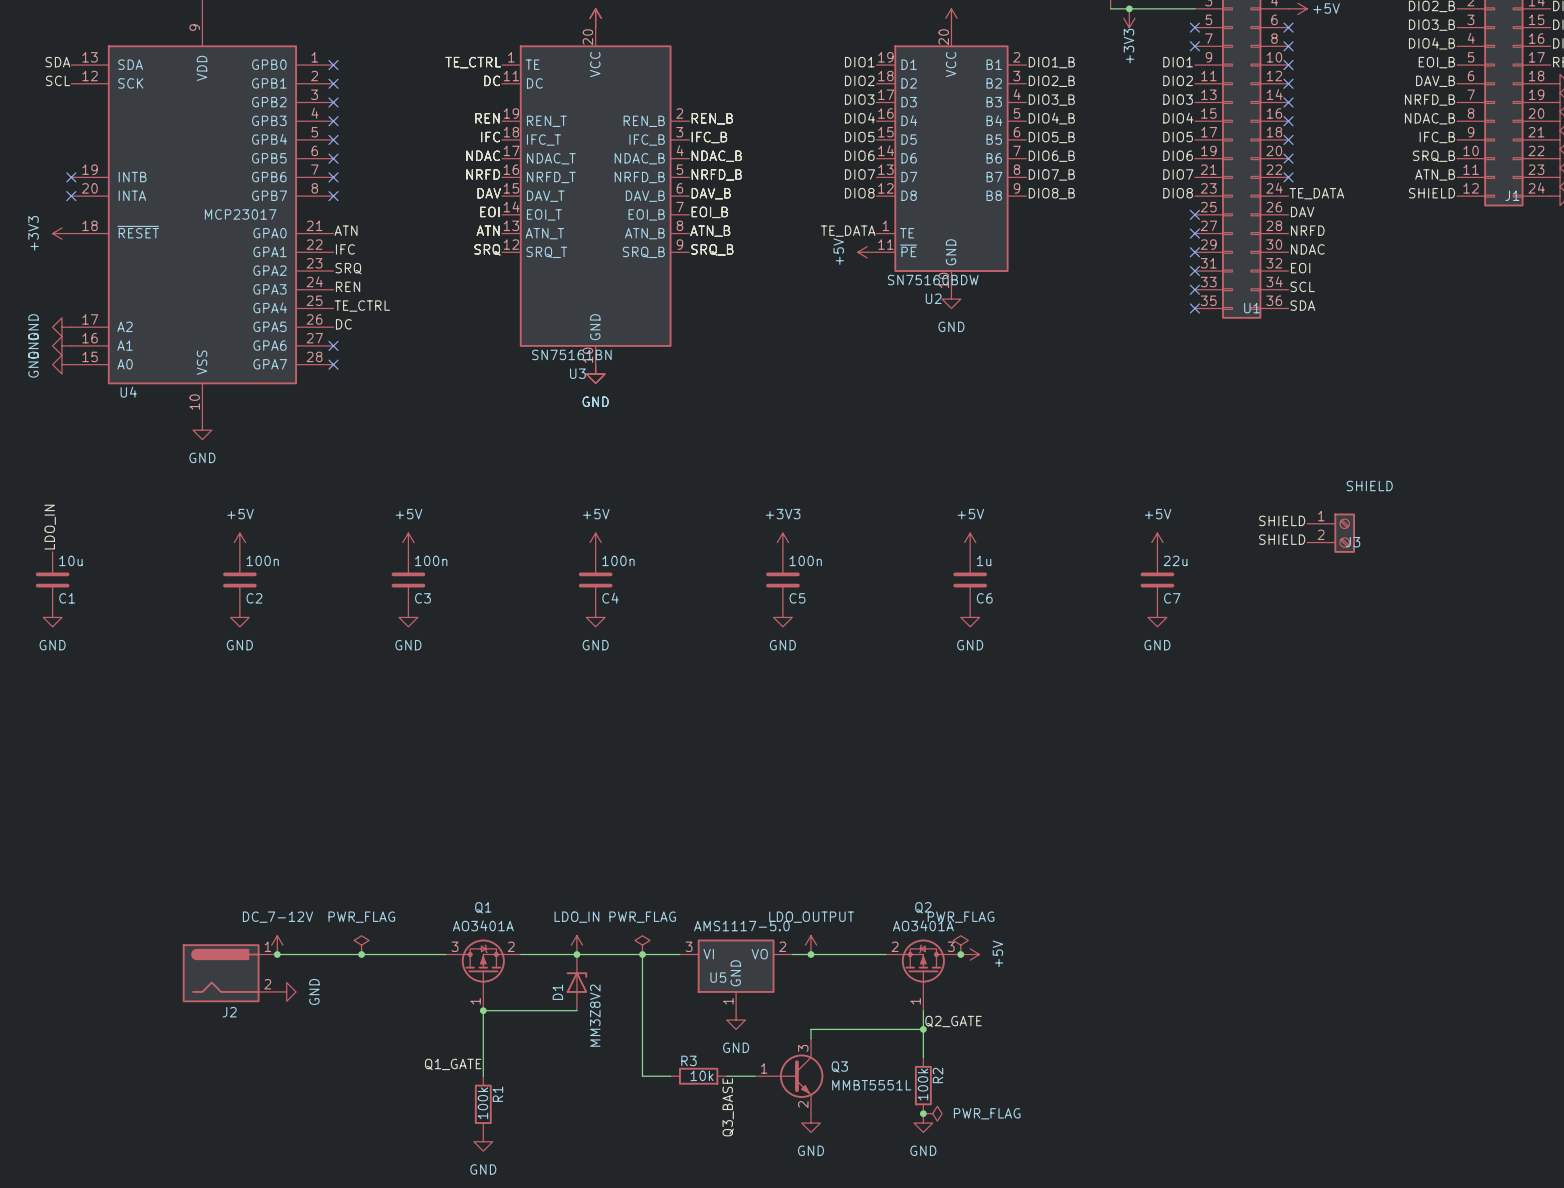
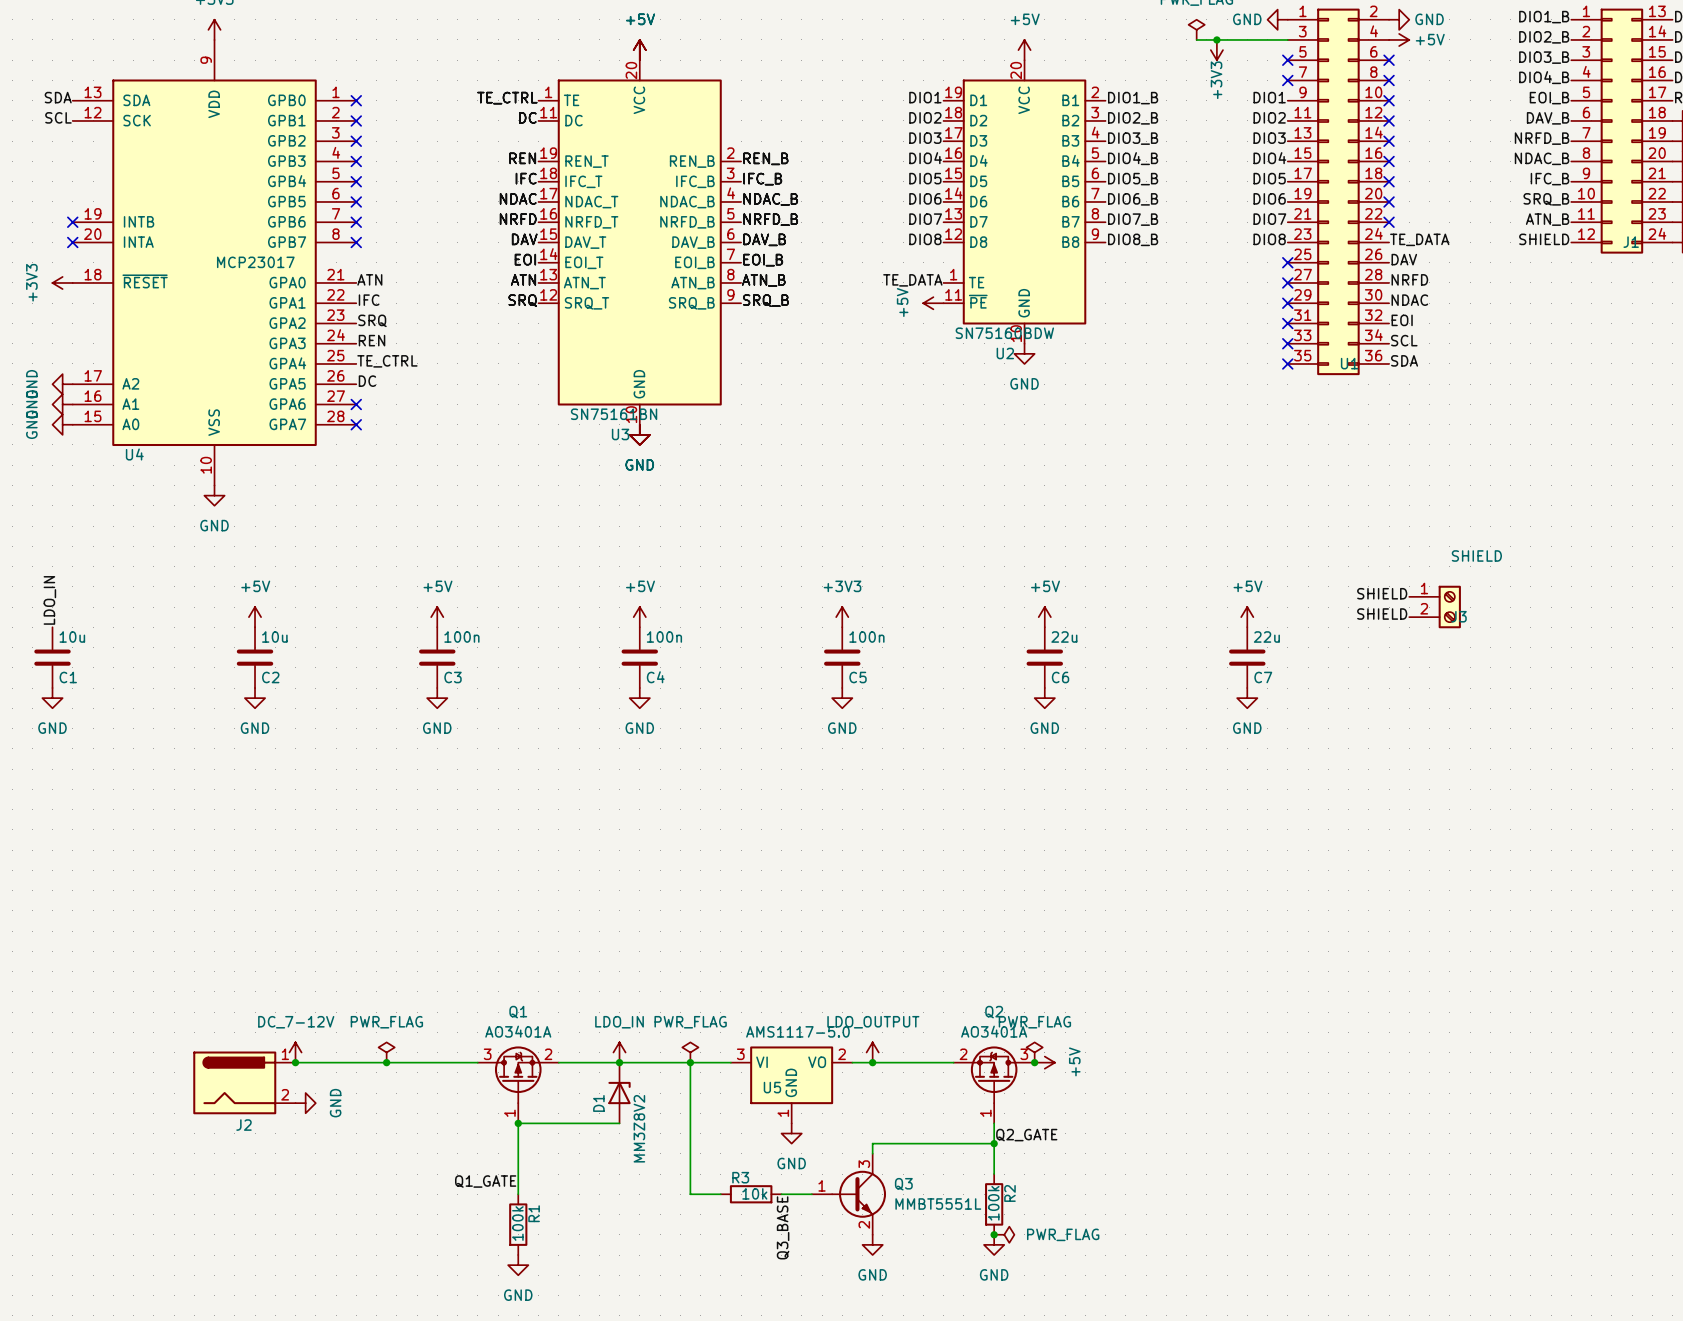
C2 value: 100n (262, 560) -> 10u (274, 637)
C6 value: 1u (984, 560) -> 22u (1064, 637)

